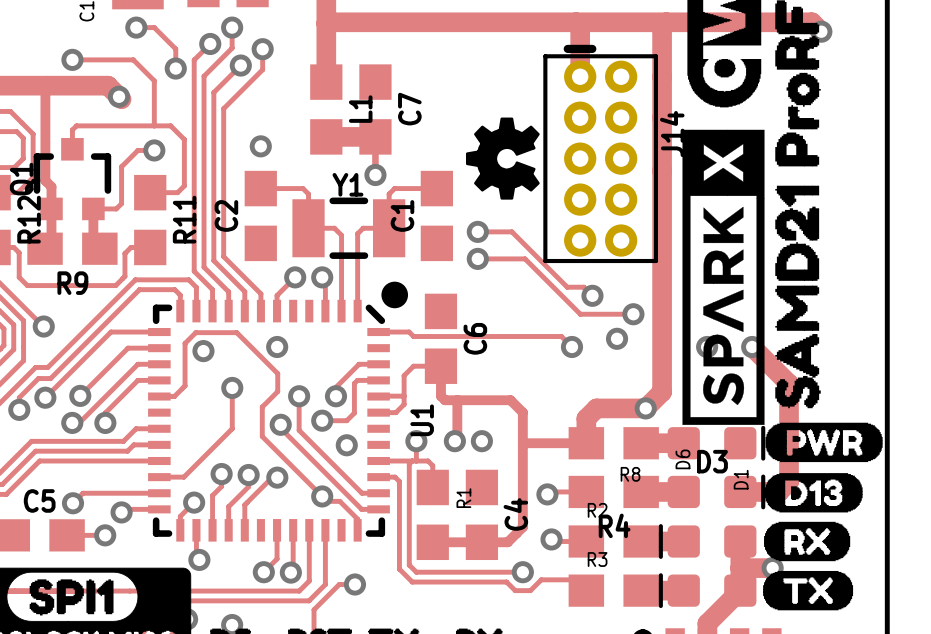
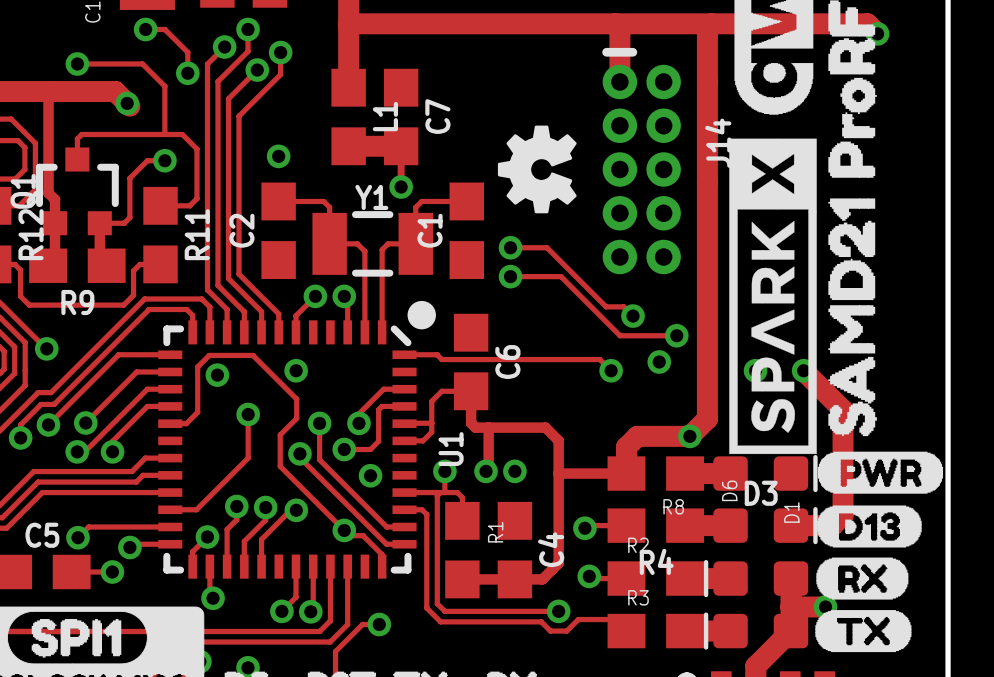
J14 footprint: [543, 44, 659, 264] -> [602, 47, 681, 275]

